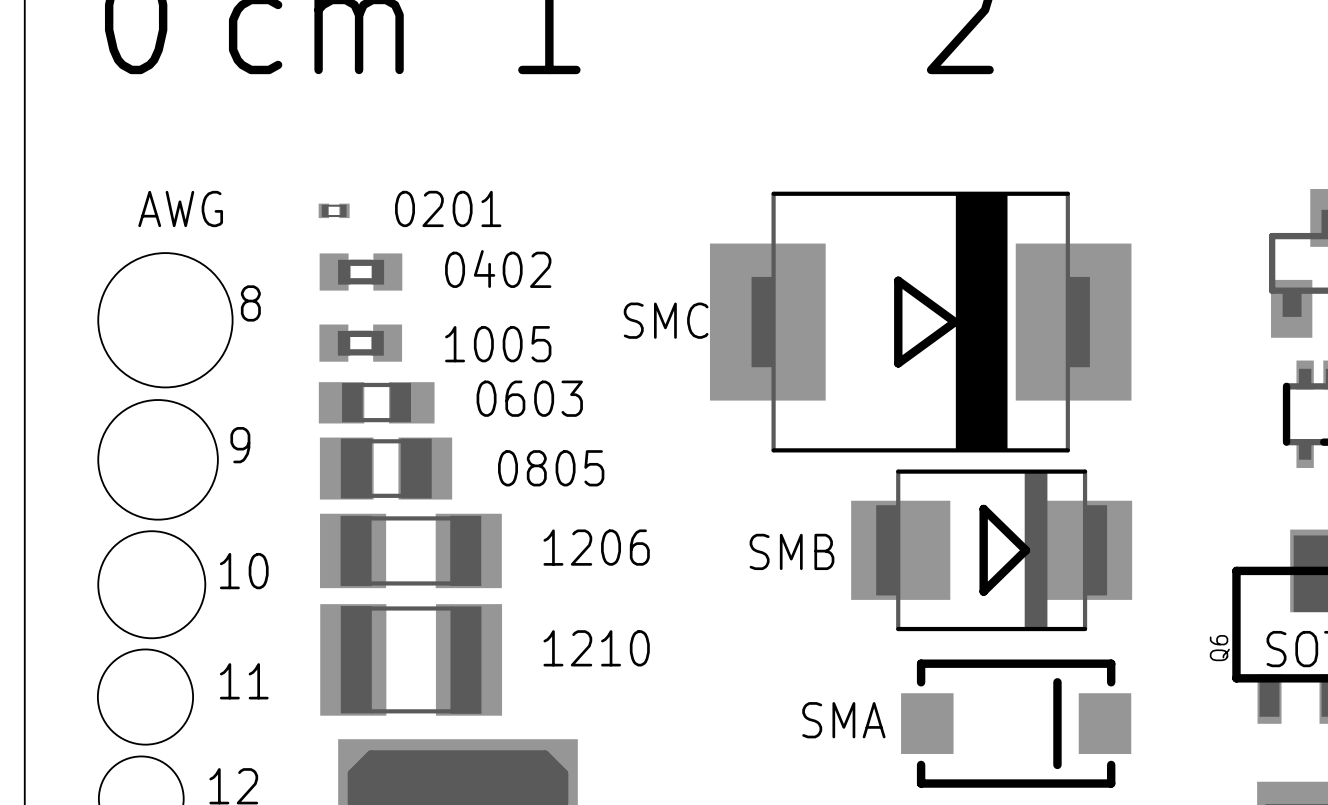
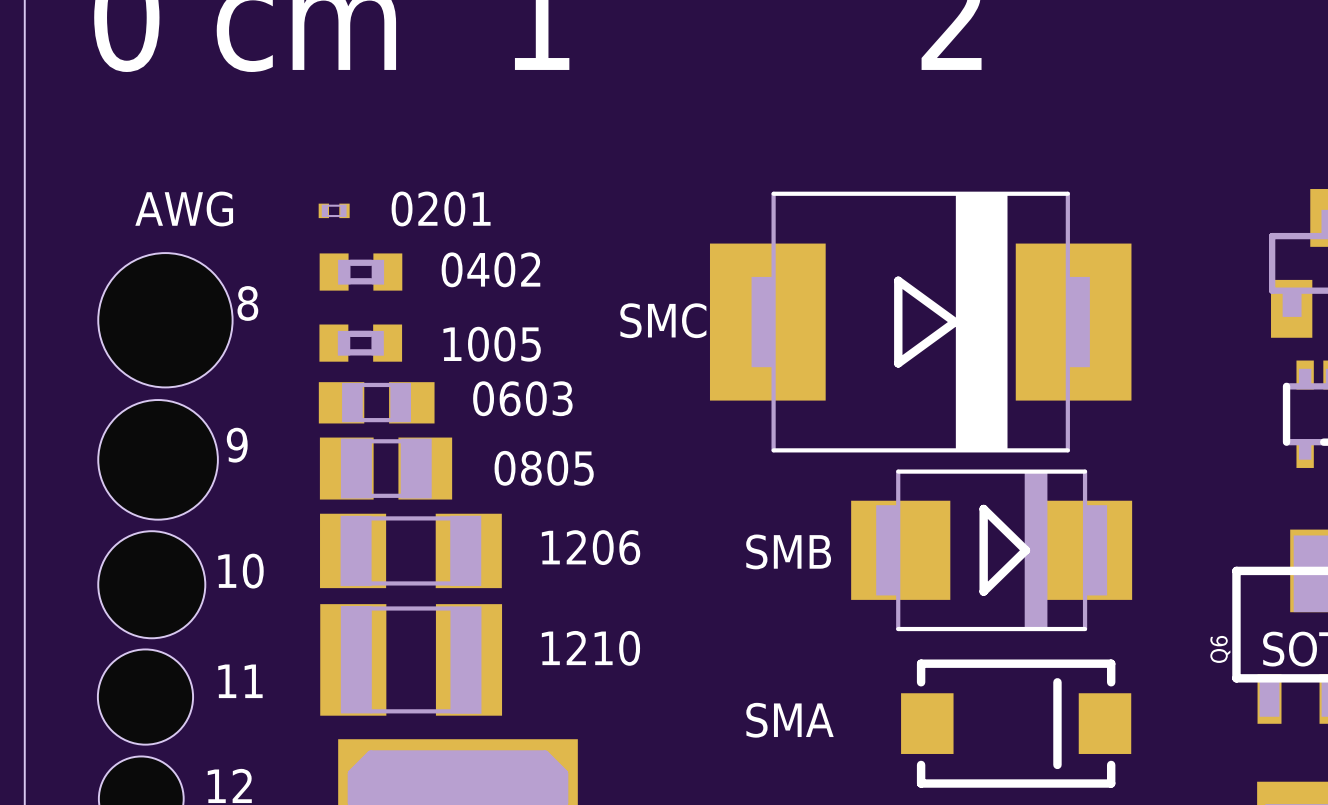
text position: SMA (843, 720) -> SMA (790, 720)

